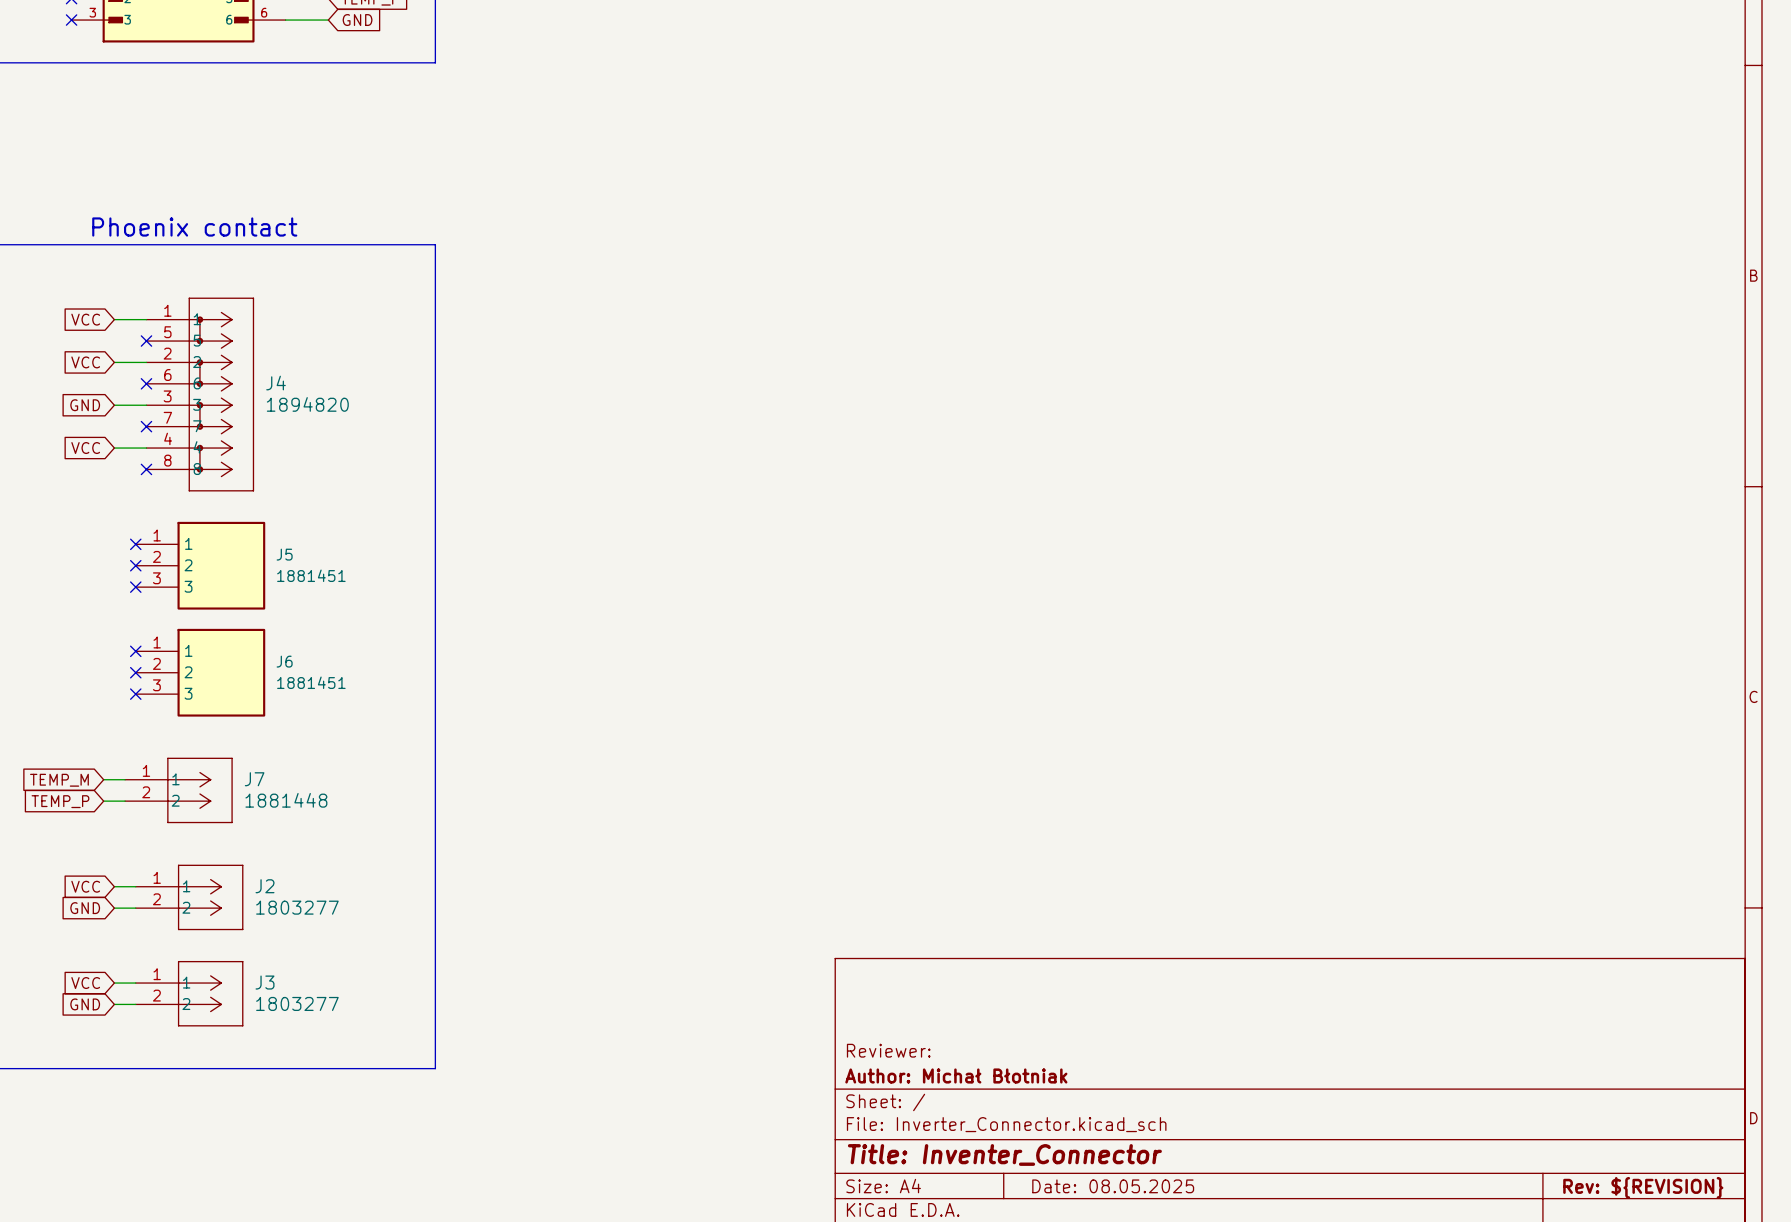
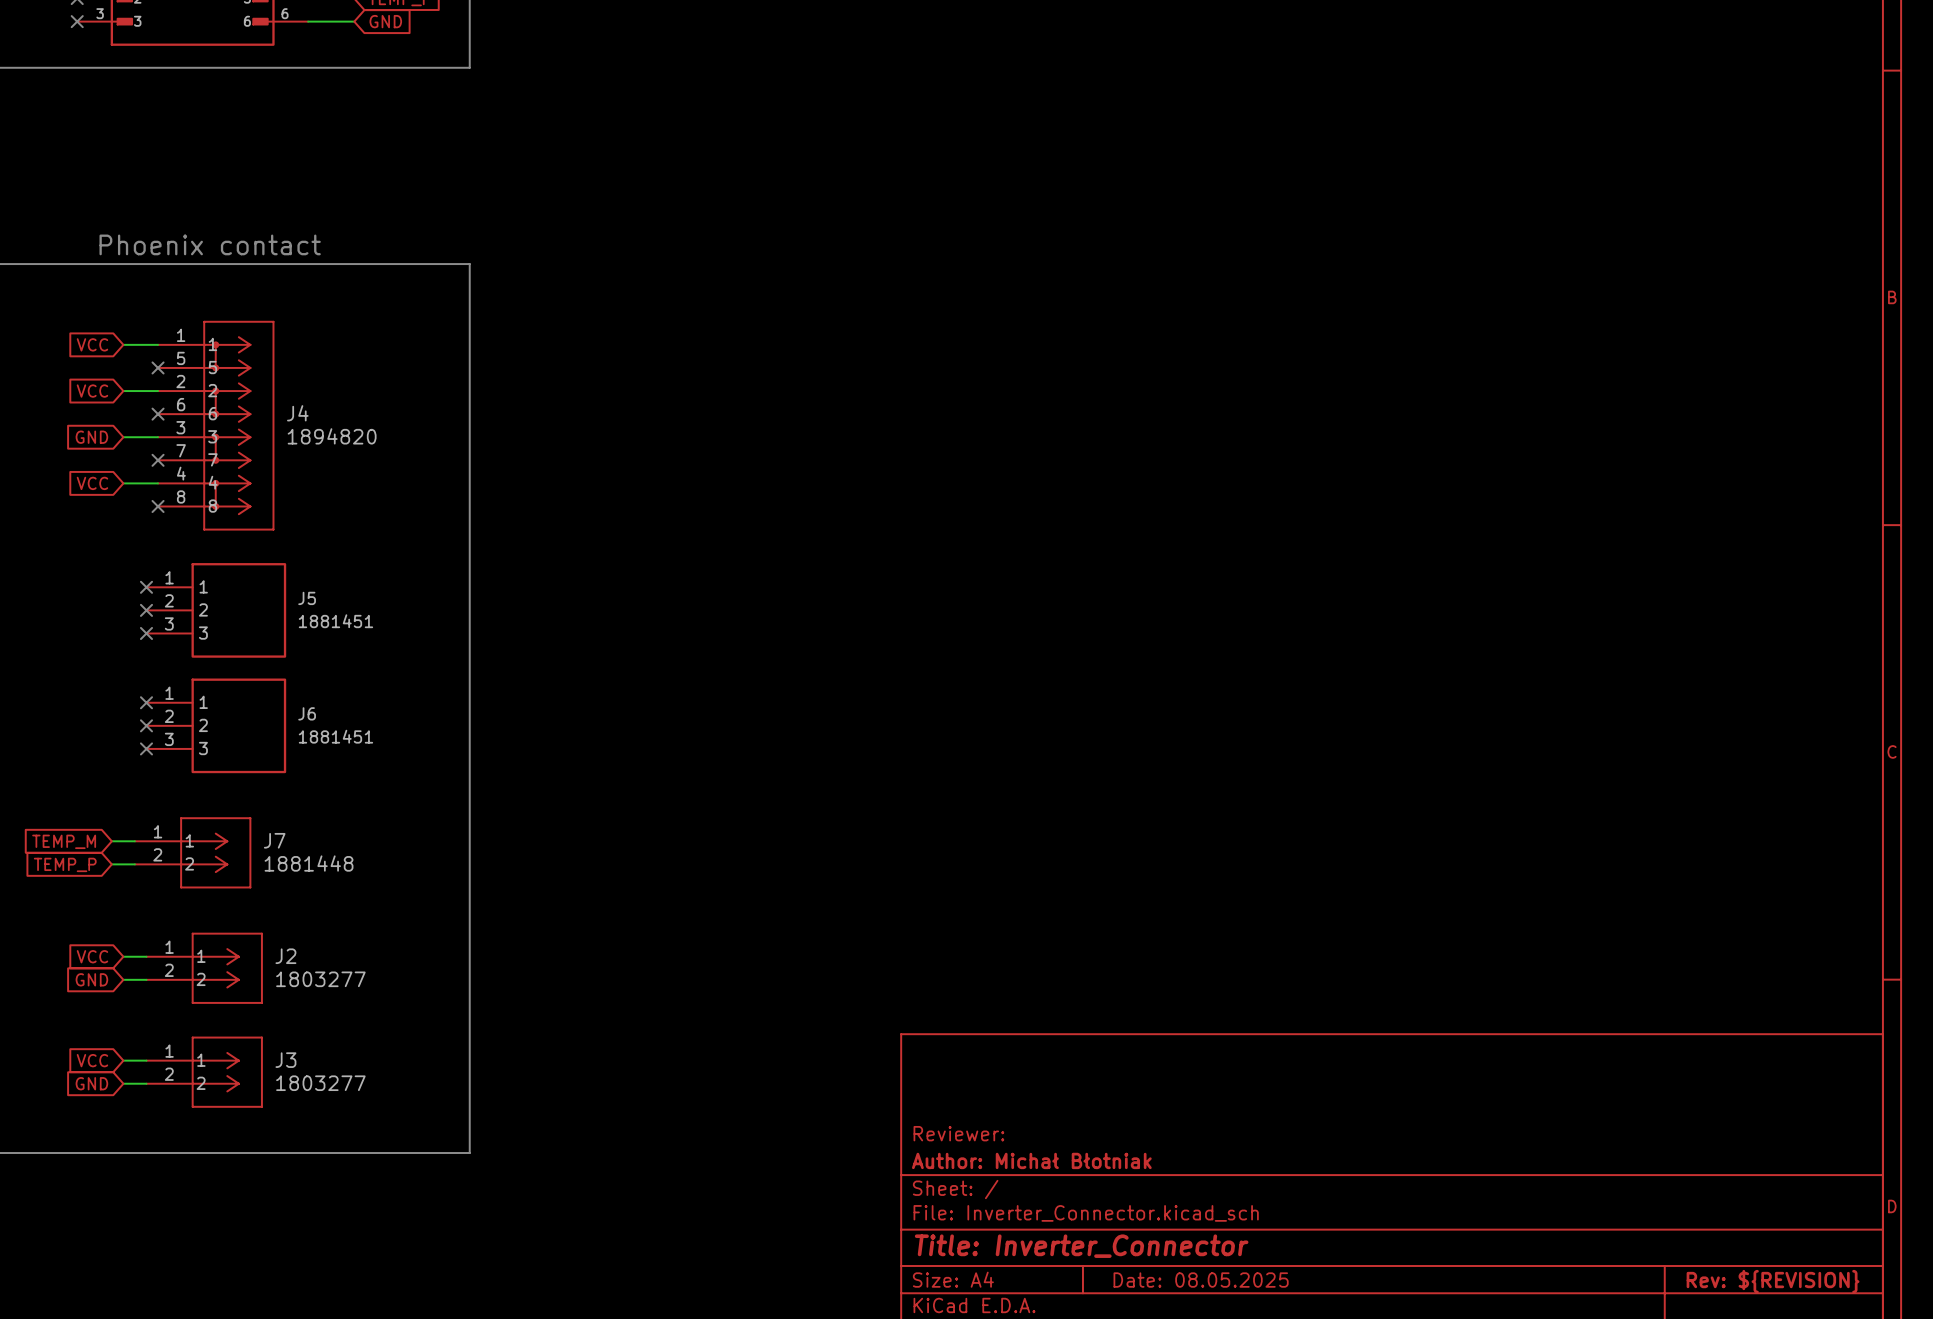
title block: Title: Inventer_Connector (1004, 1154) -> Title: Inverter_Connector (1081, 1246)

